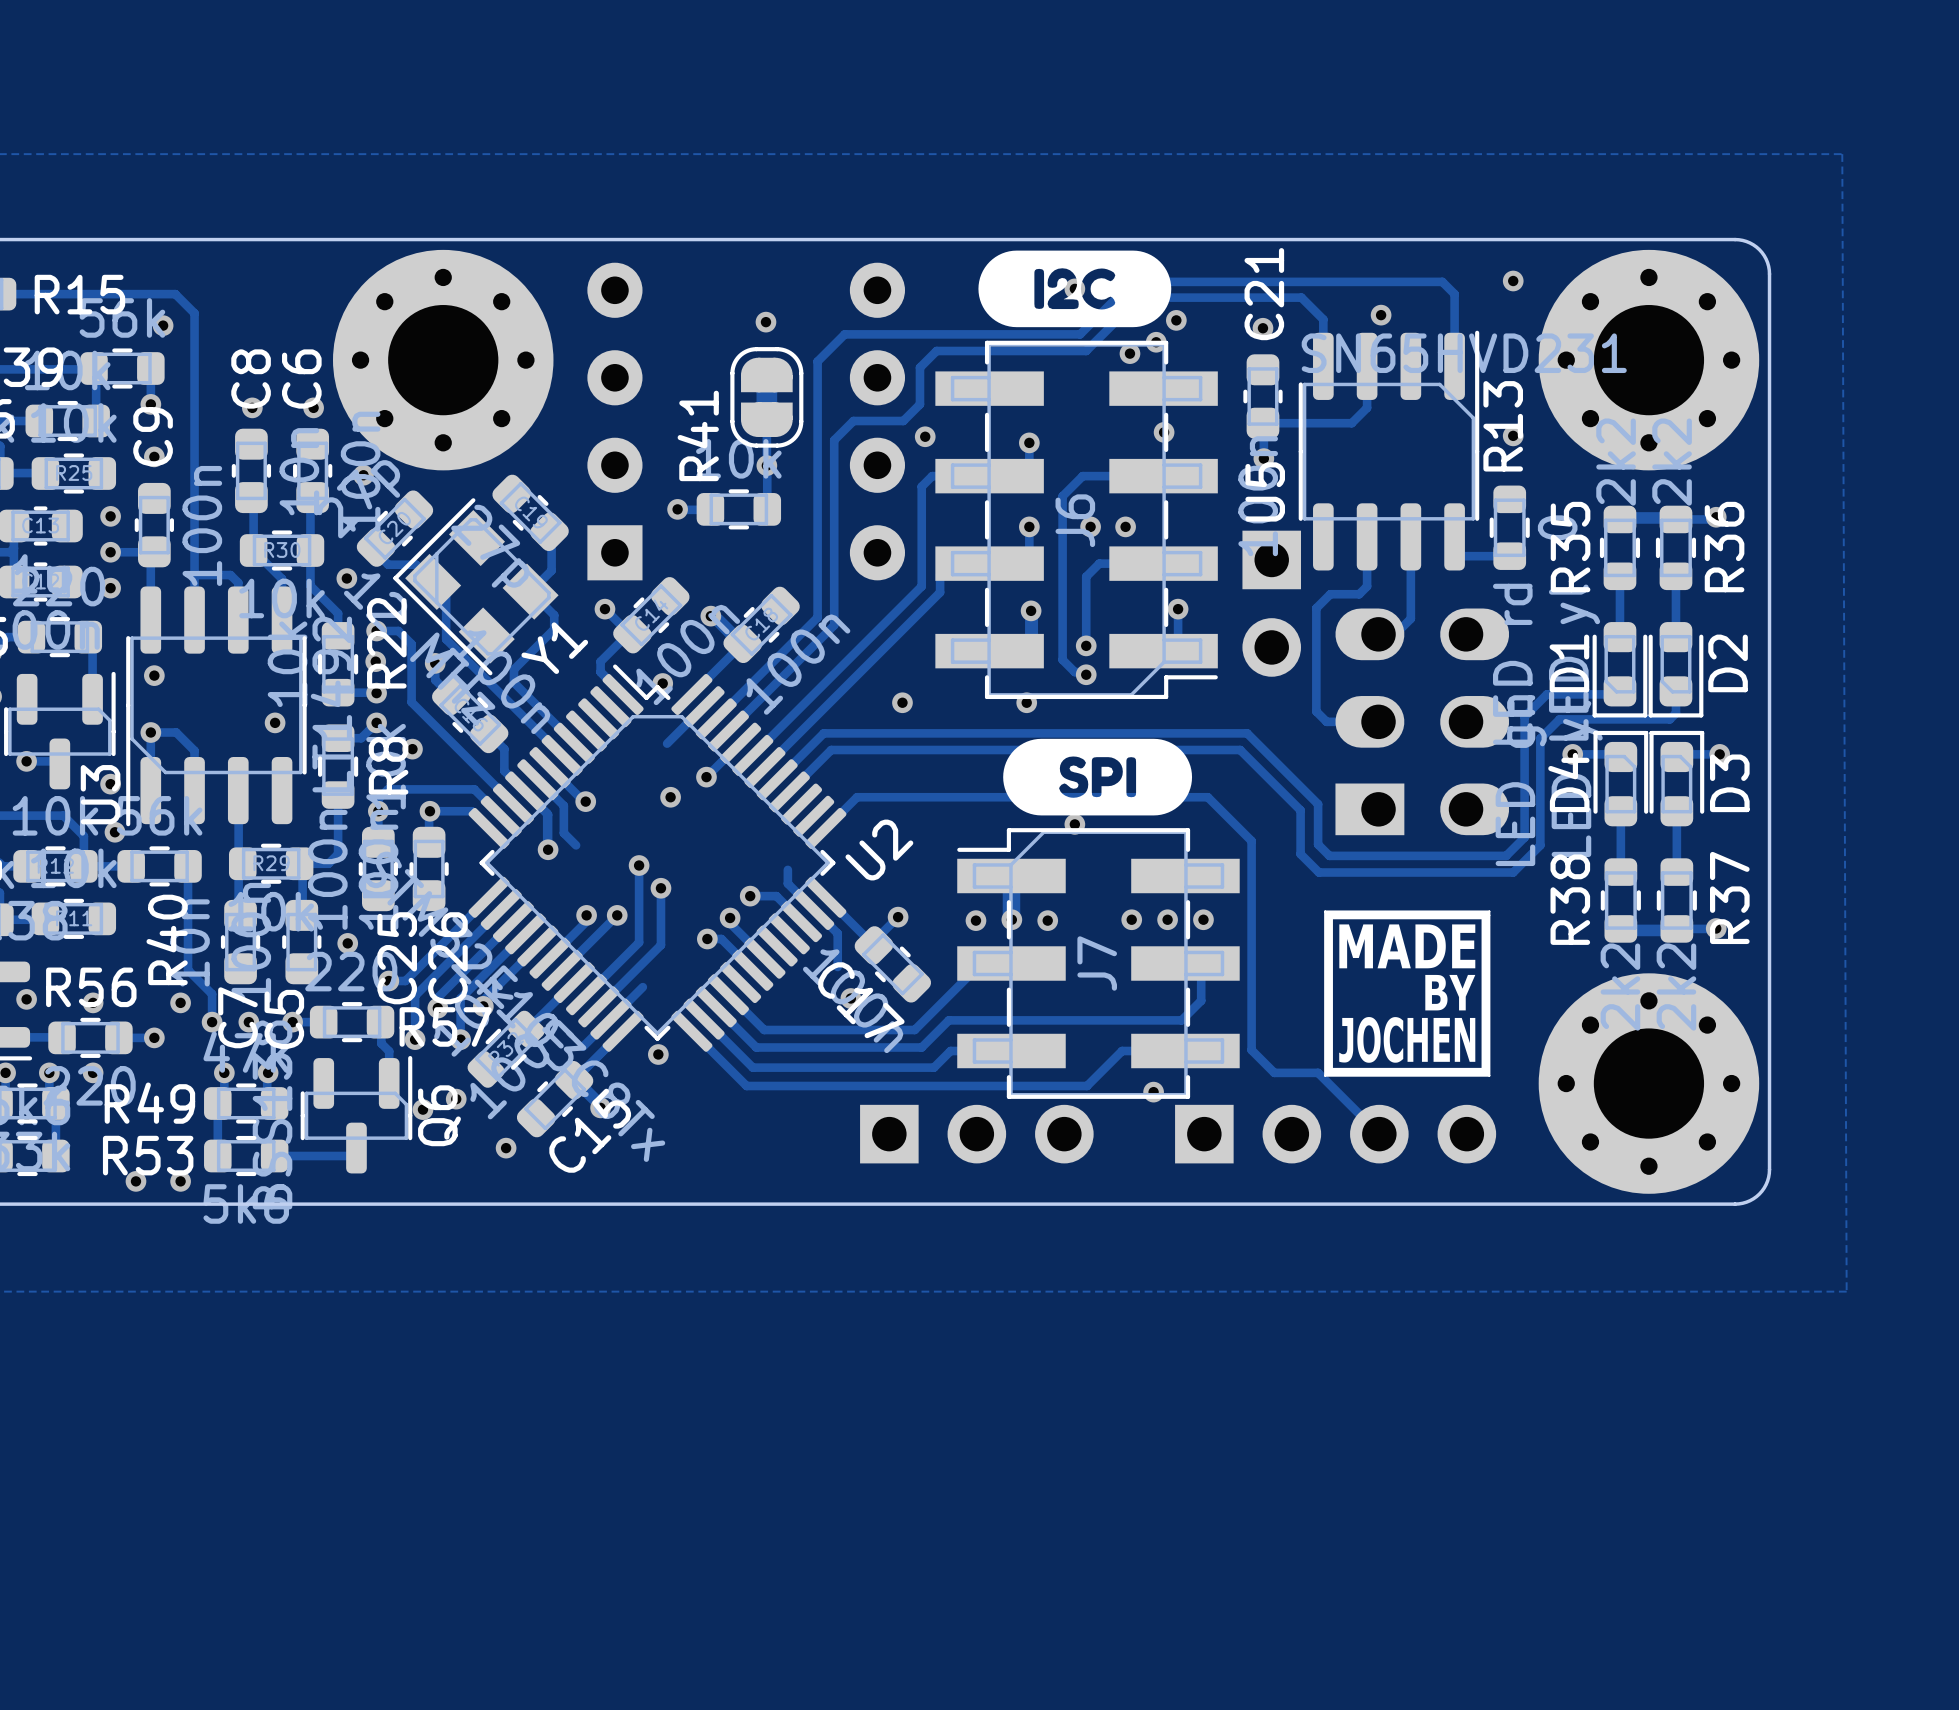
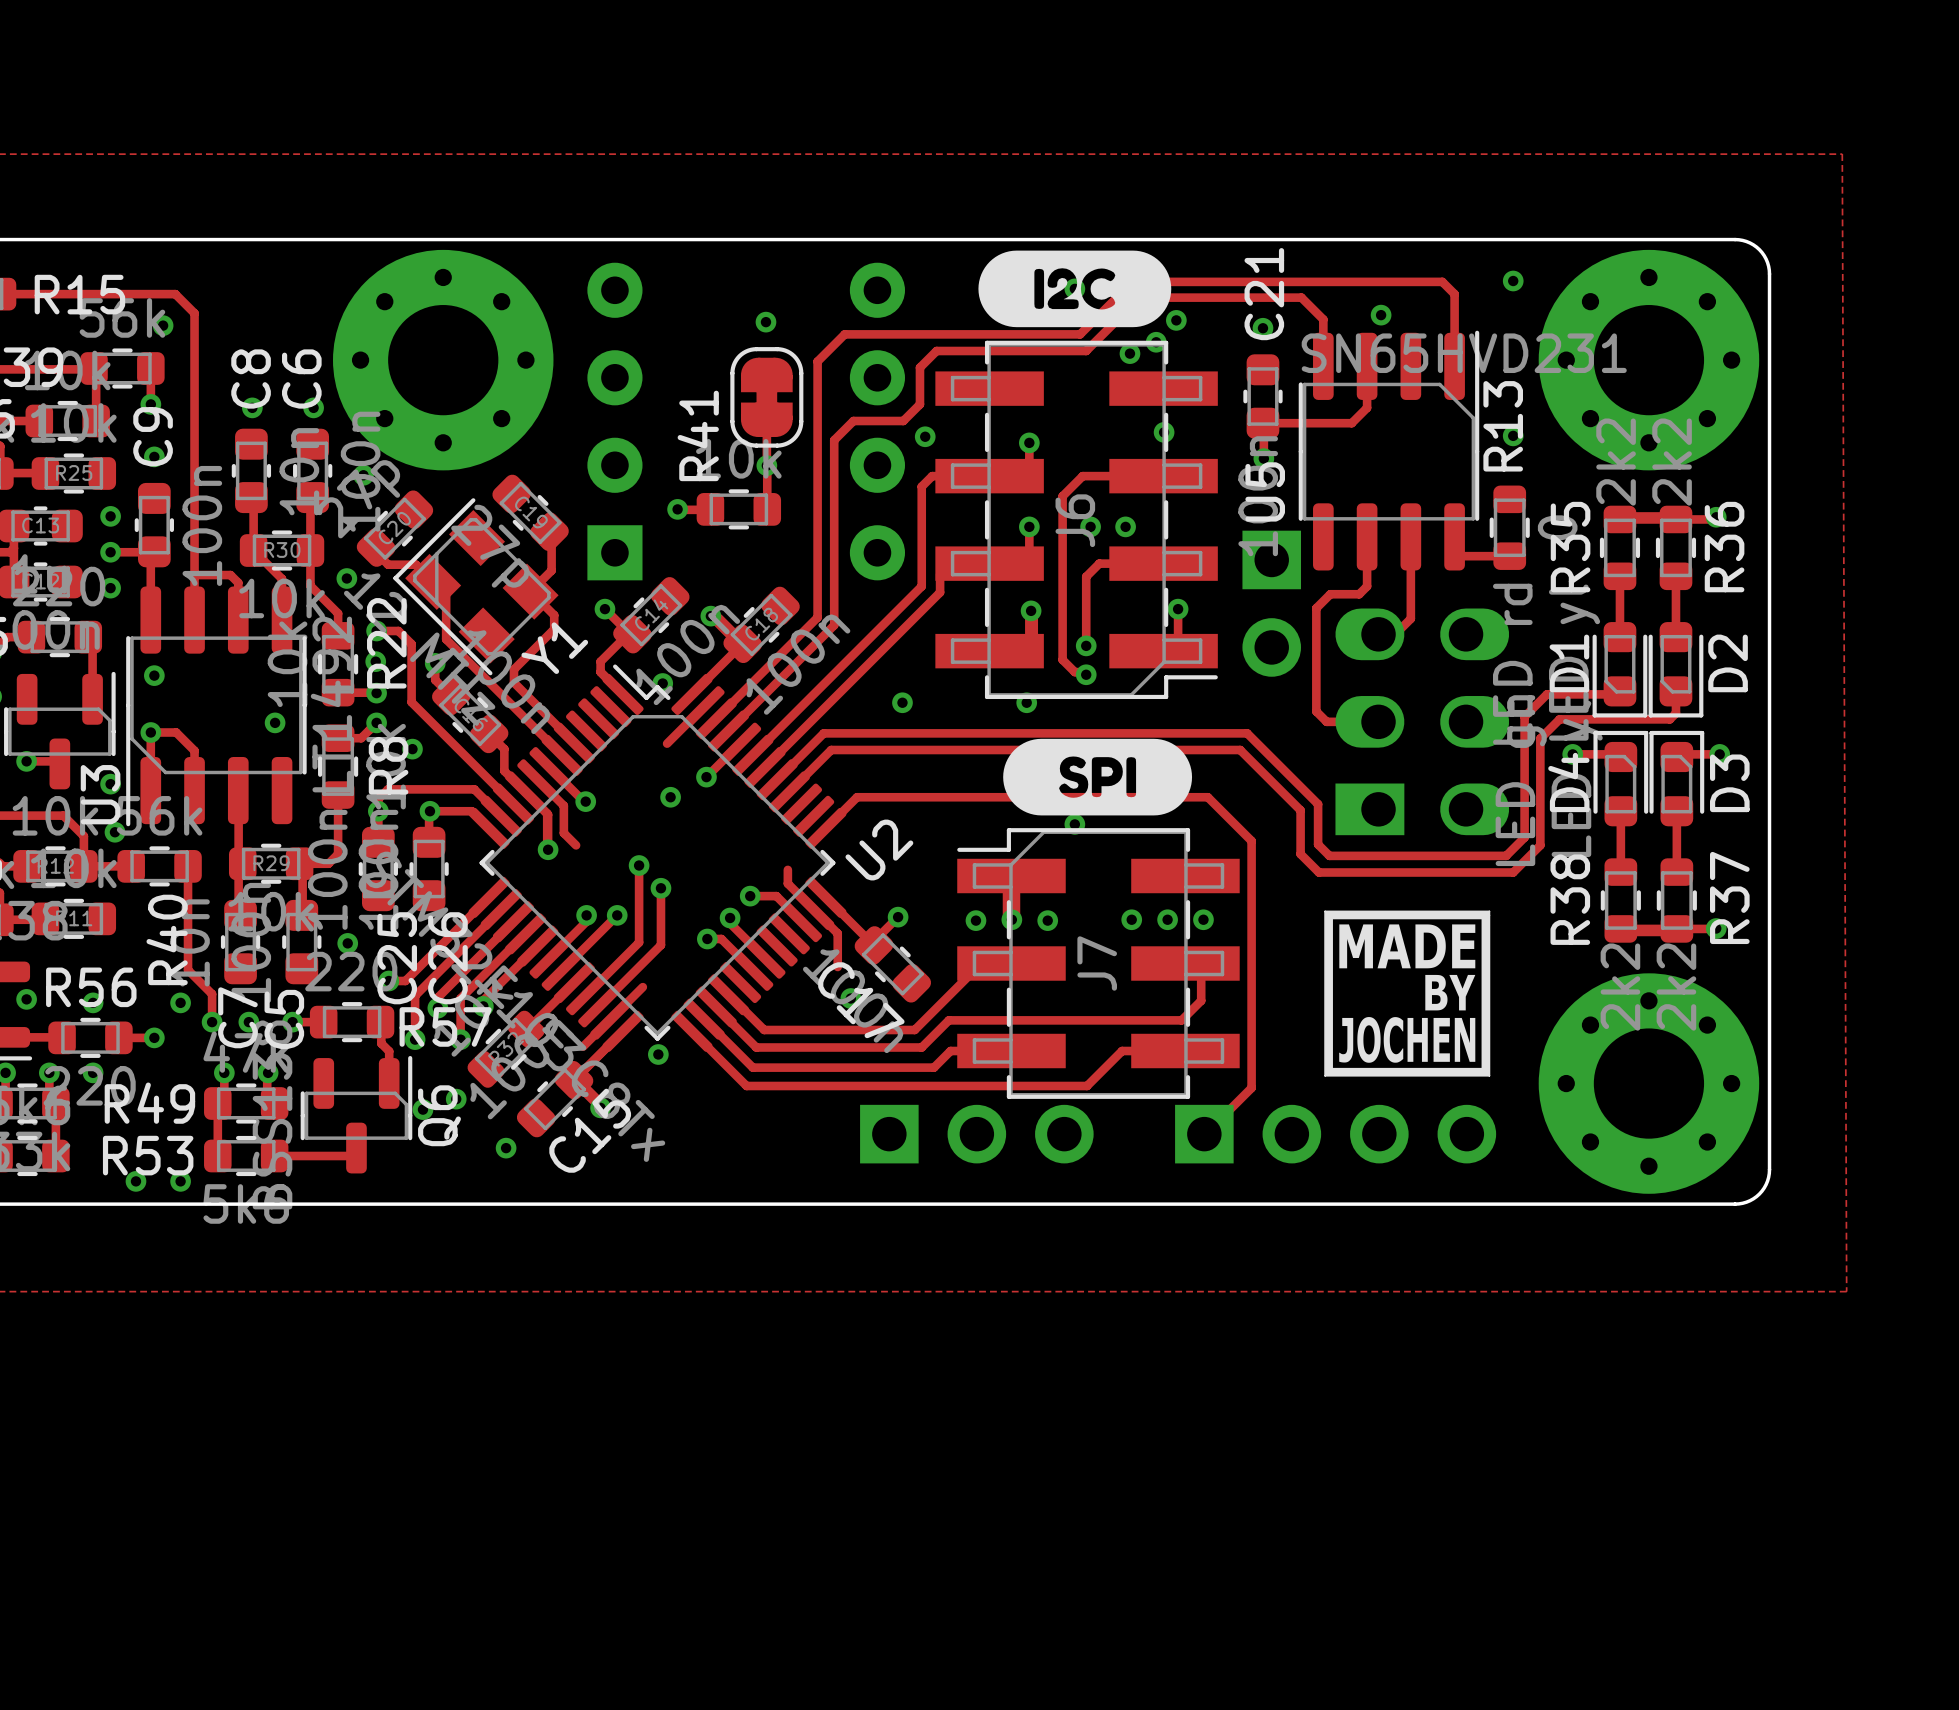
track: (1251, 1050) (1274, 1072) (1318, 1072) (1379, 1134) -> (1251, 1050) (1251, 1087) (1204, 1135)
via: (1153, 1092) -> none

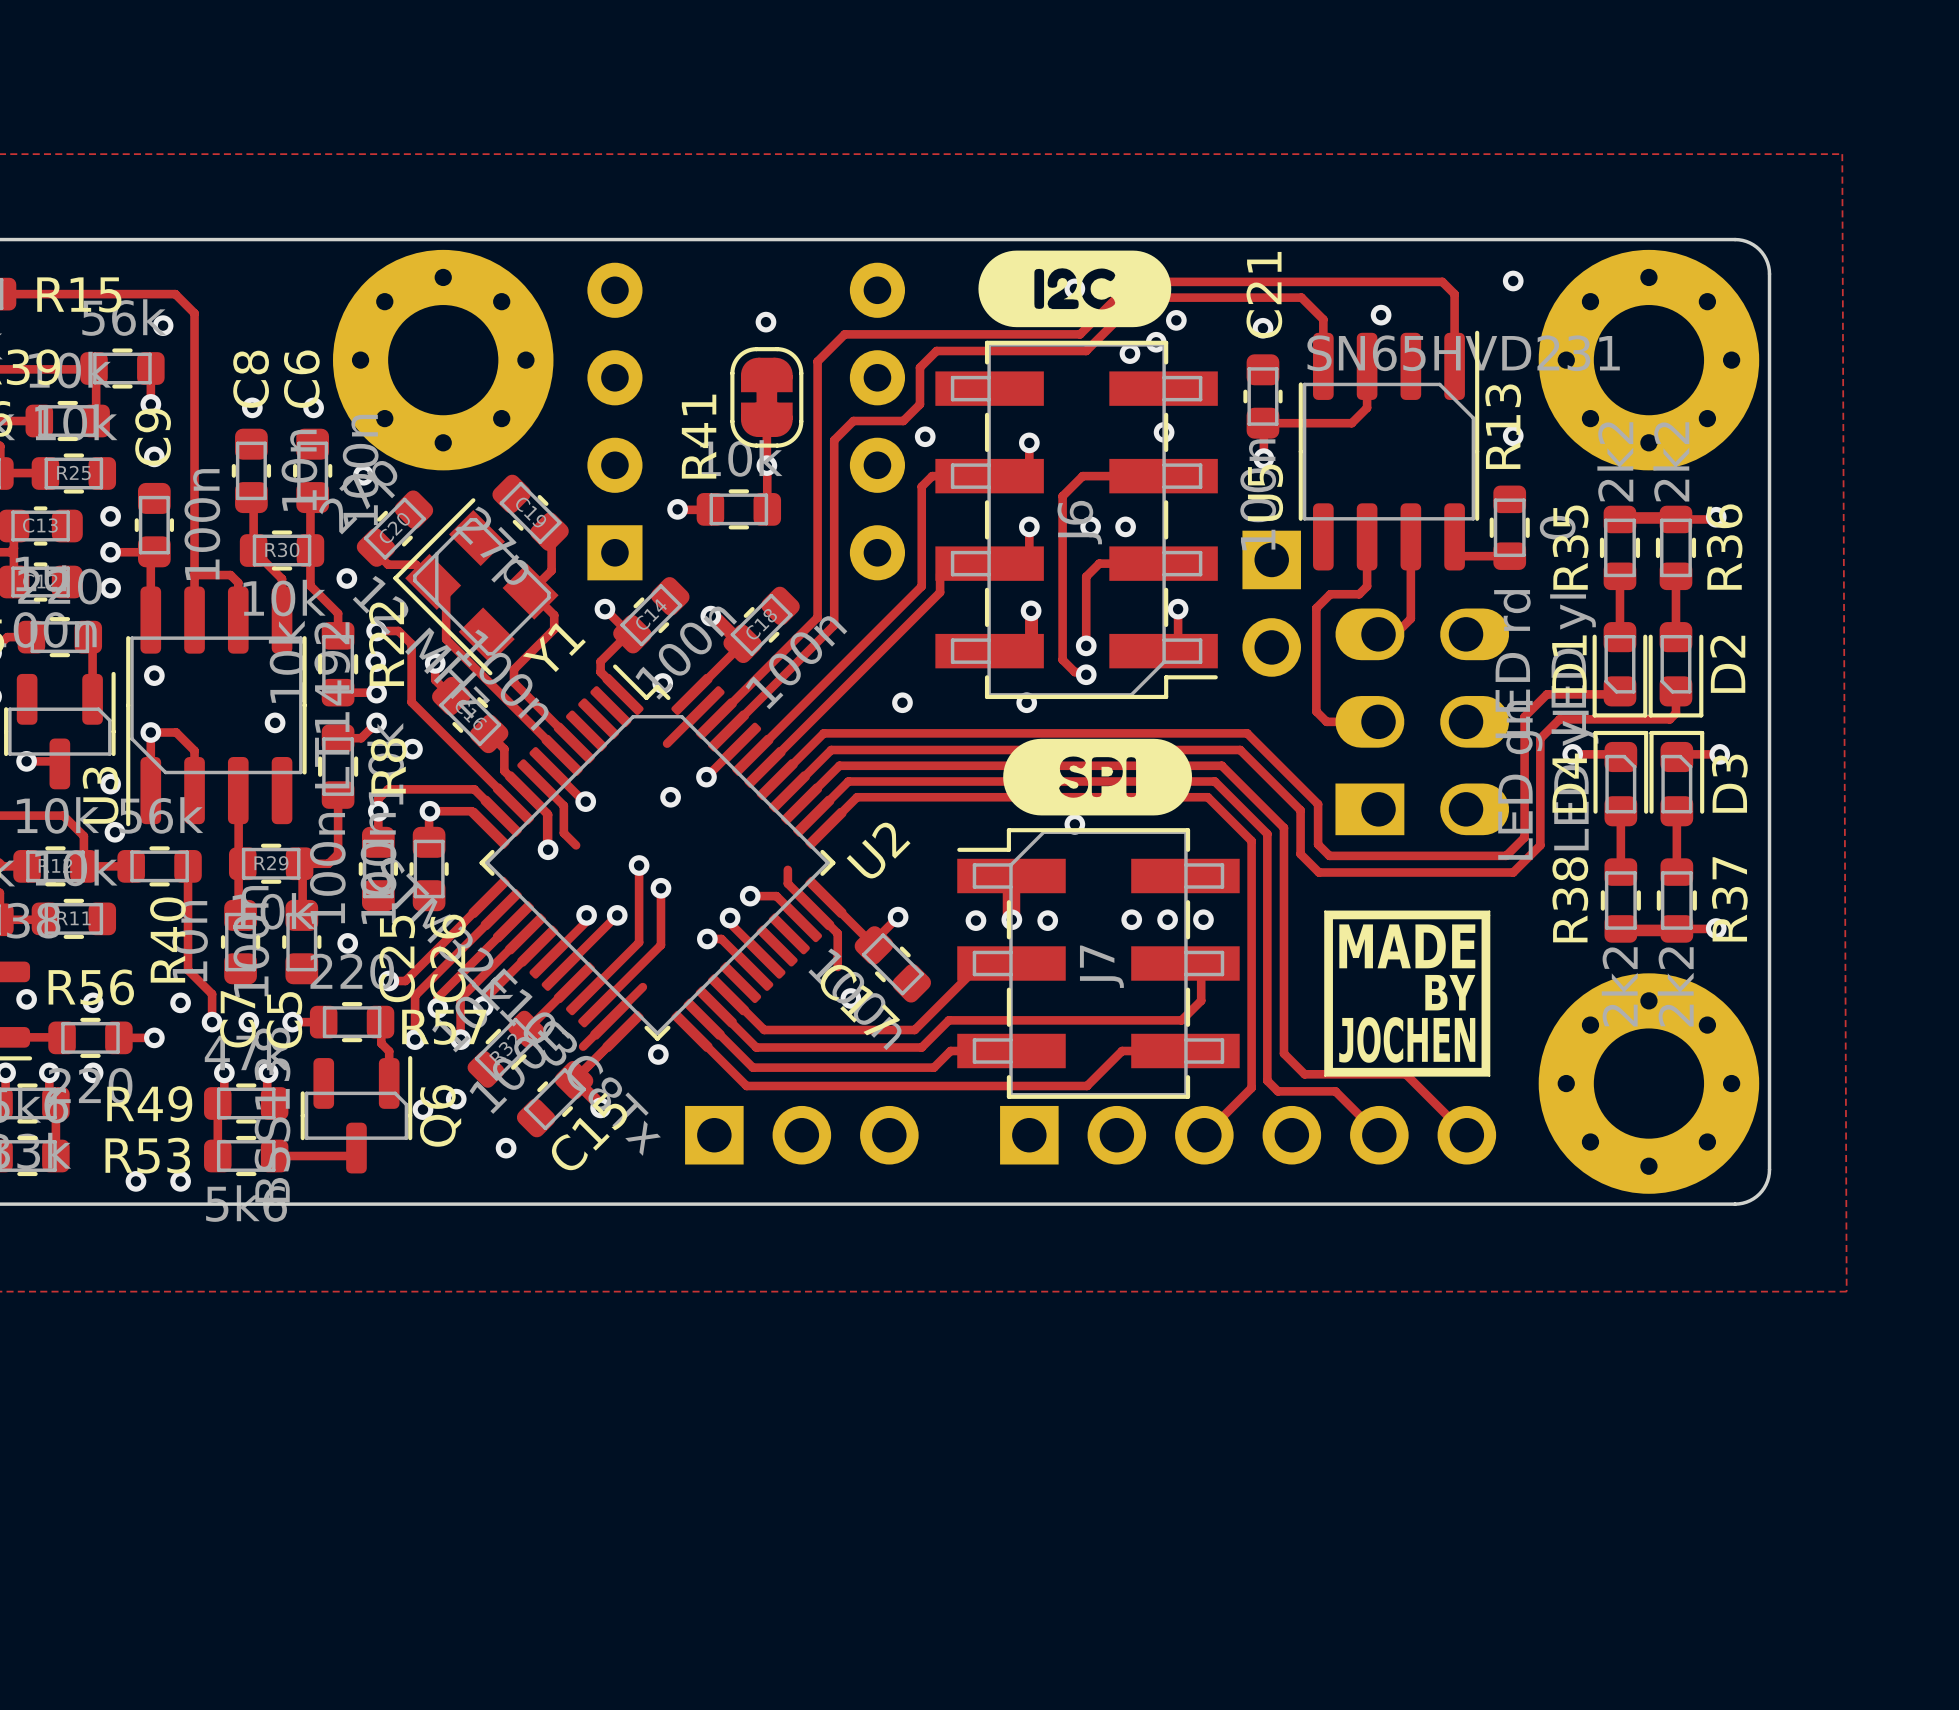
track: none -> (801, 803) (839, 765) (1221, 765) (1283, 827) (1283, 1053) (1304, 1074) (1405, 1074) (1466, 1135)
track: none -> (813, 816) (848, 781) (1214, 781) (1267, 834) (1267, 1080) (1277, 1091) (1335, 1091) (1379, 1135)
part position: (976, 1134) -> (801, 1135)
part: (1335, 1134) -> none
part: none -> (1248, 1135)

